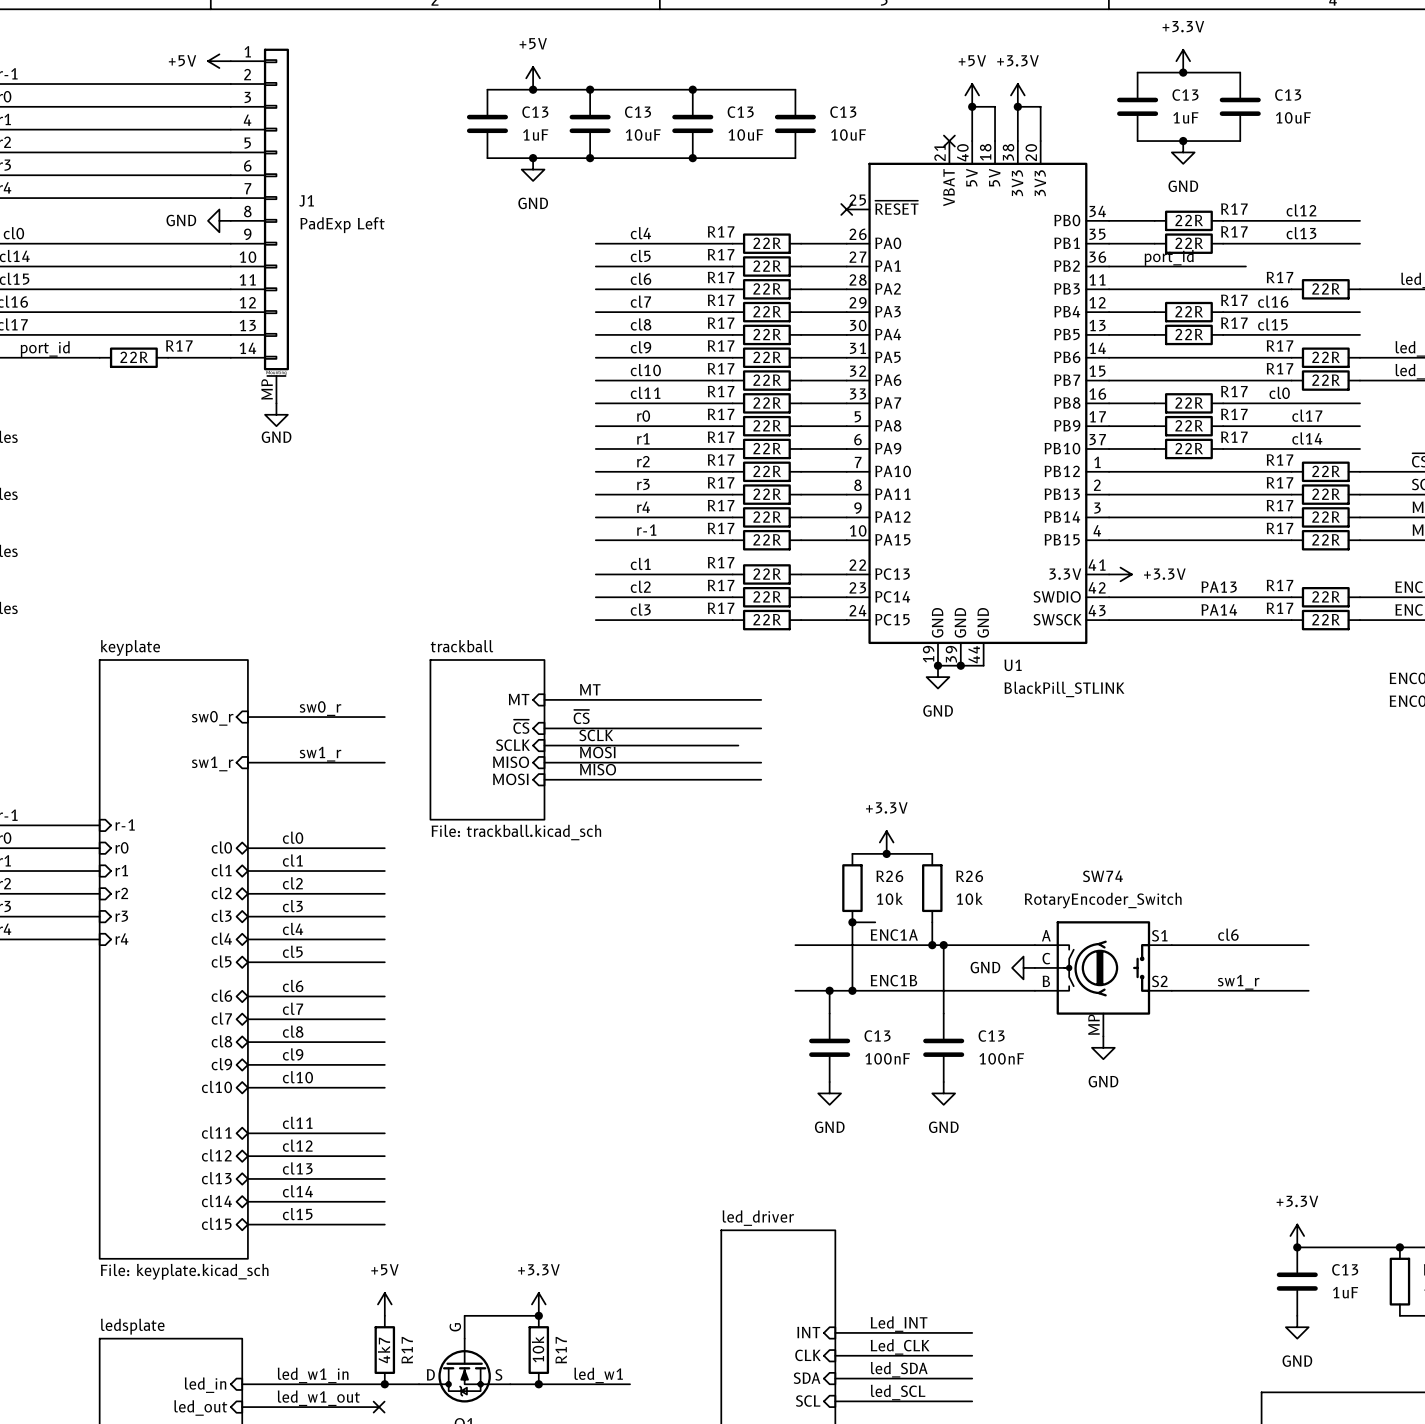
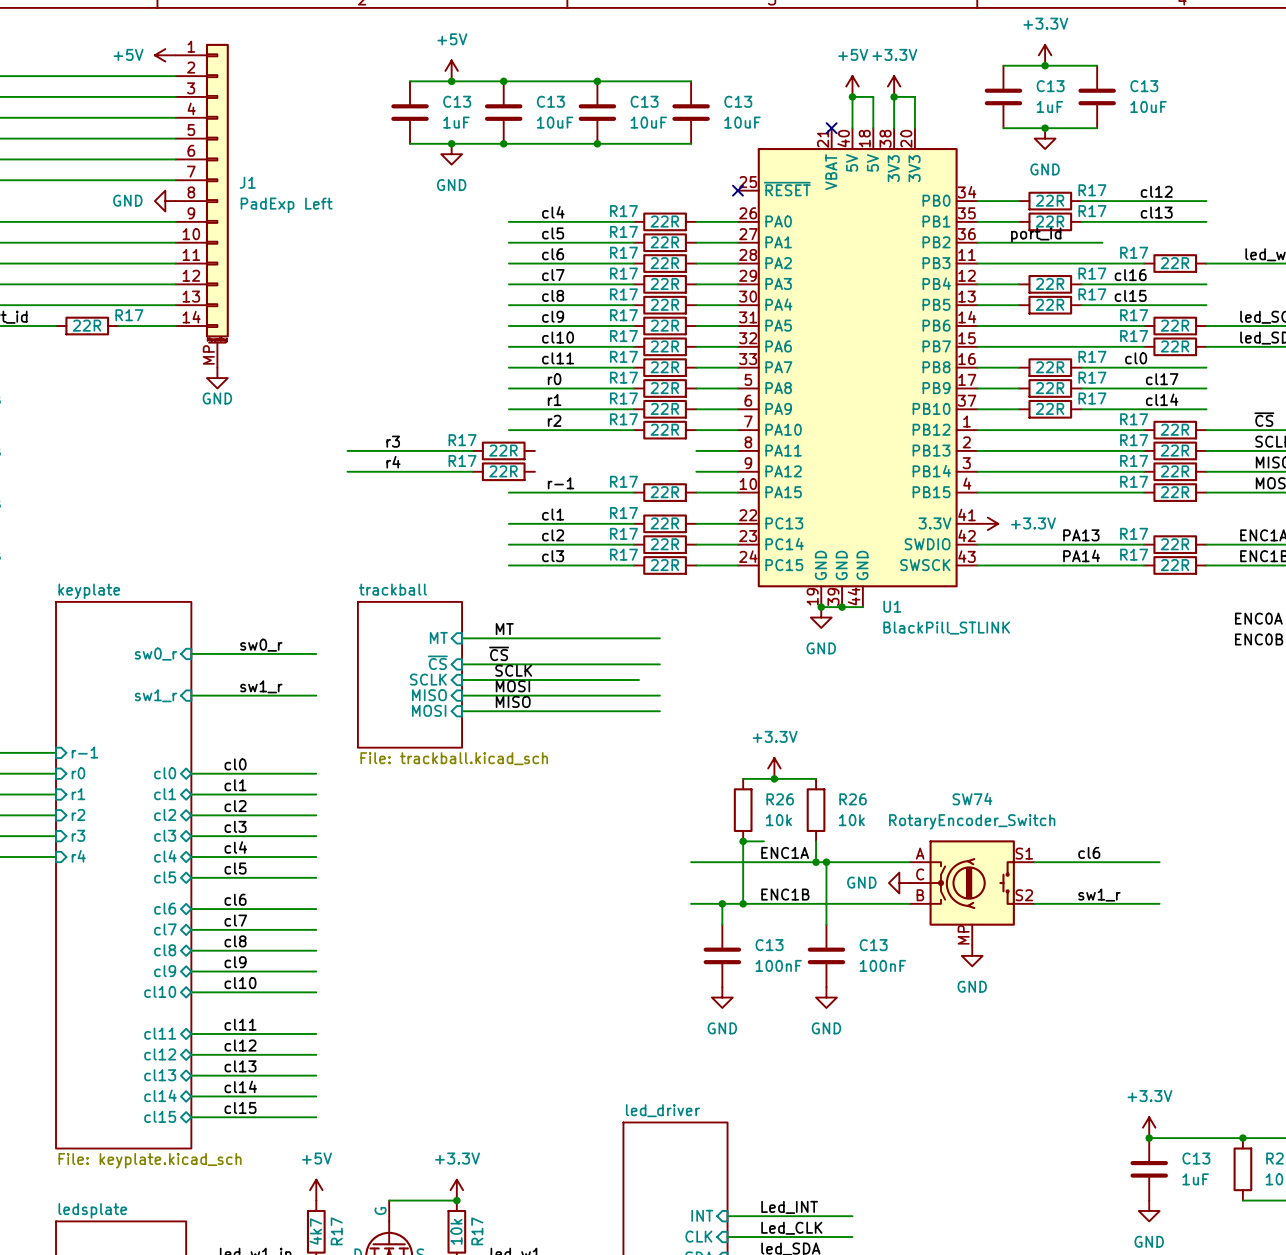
label position: r3 (643, 484) -> r3 (393, 441)
R17: none -> 22R (503, 450)
wire: (595, 494) (732, 494) -> (347, 450) (472, 450)
R17: 22R (766, 494) -> none
label position: r4 (643, 507) -> r4 (393, 462)
R17: none -> 22R (503, 471)
wire: (595, 517) (732, 517) -> (347, 471) (472, 471)
R17: 22R (766, 517) -> none

